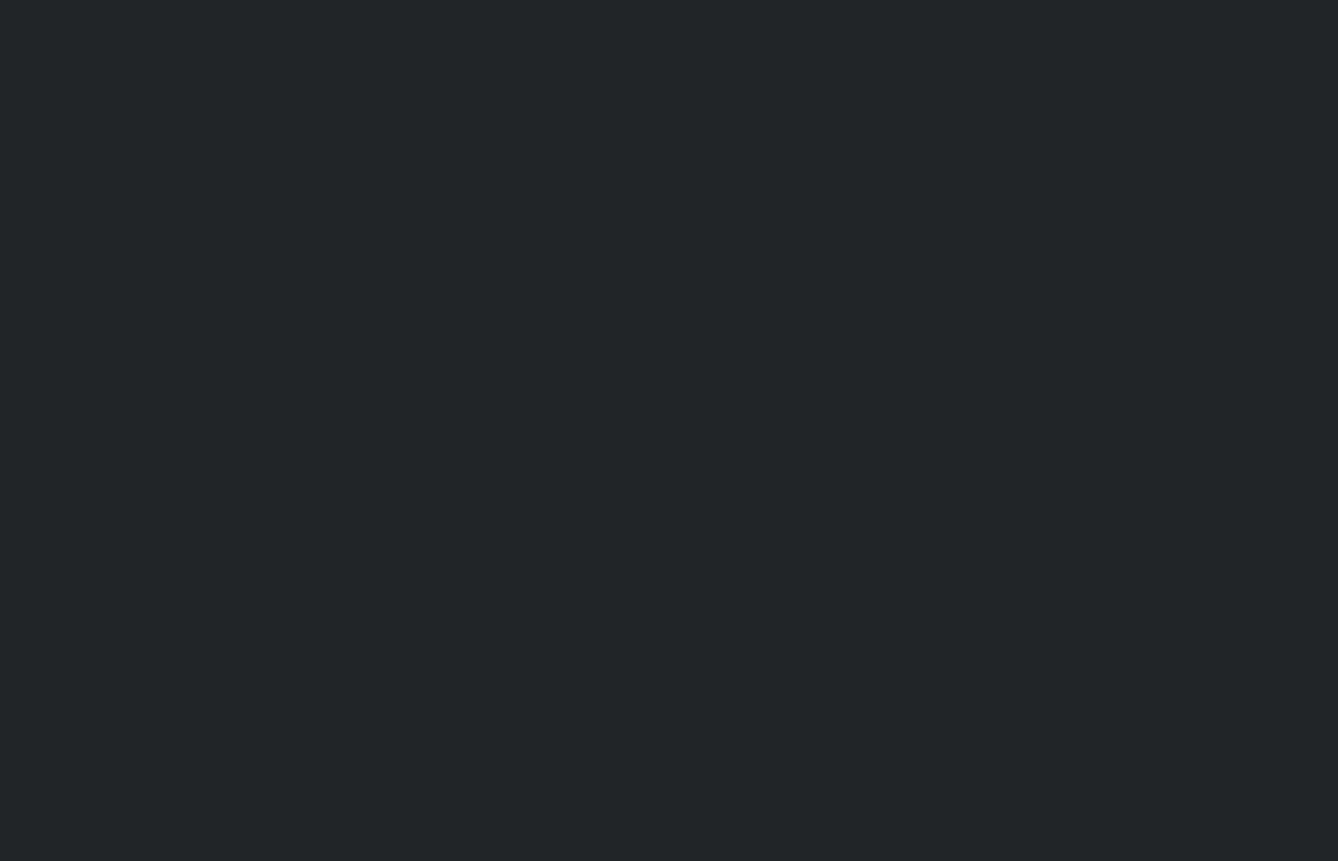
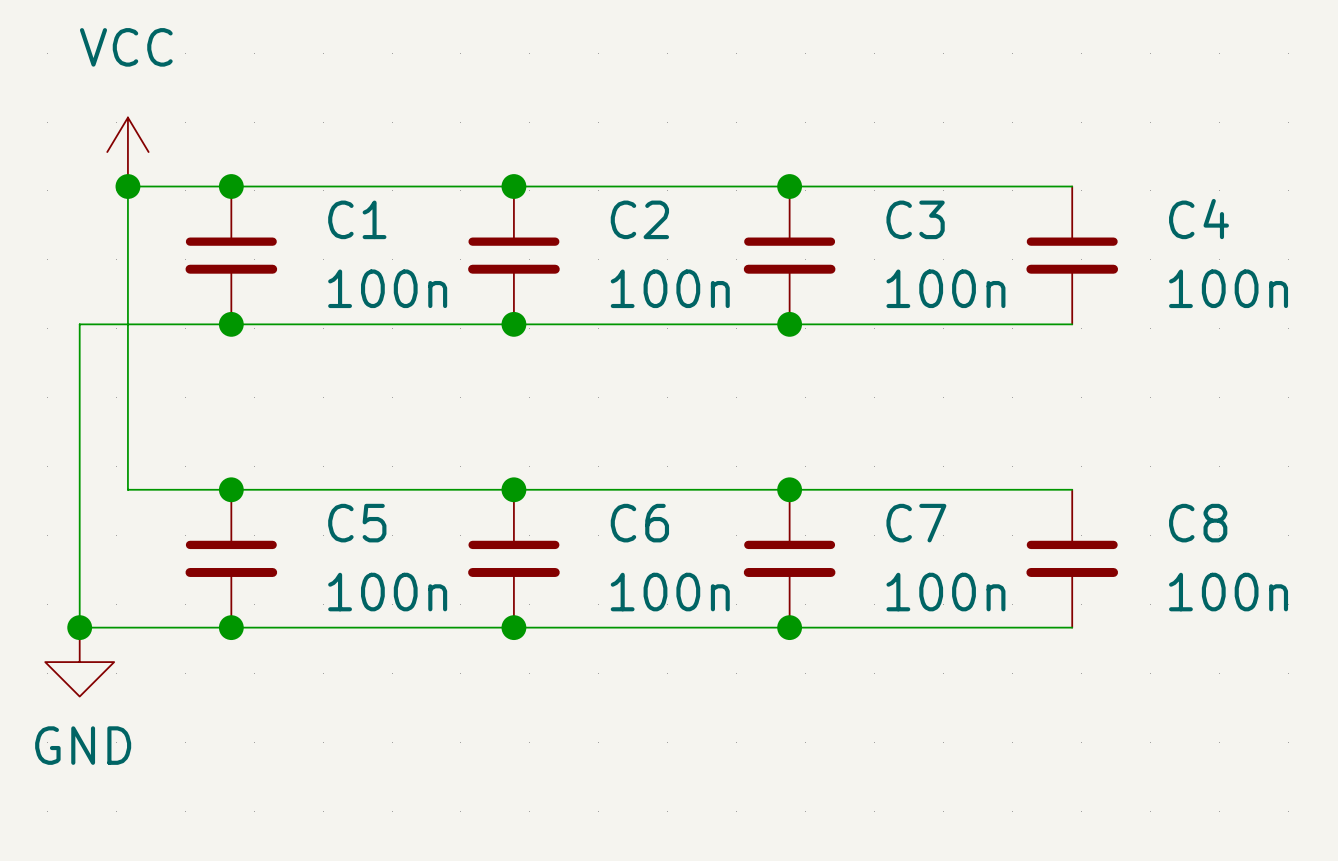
power symbol: none -> VCC (127, 152)
junction: none -> (127, 186)
junction: none -> (231, 186)
junction: none -> (513, 186)
junction: none -> (789, 186)
wire: none -> (1072, 186) (127, 186) (127, 489) (1072, 489)
C1: none -> 100n (231, 255)
C2: none -> 100n (513, 255)
C3: none -> 100n (789, 255)
C4: none -> 100n (1072, 255)
junction: none -> (231, 324)
junction: none -> (513, 324)
junction: none -> (789, 324)
wire: none -> (1072, 324) (79, 324) (79, 627) (1072, 627)
junction: none -> (231, 489)
junction: none -> (513, 489)
junction: none -> (789, 489)
C5: none -> 100n (231, 558)
C6: none -> 100n (513, 558)
C7: none -> 100n (789, 558)
C8: none -> 100n (1072, 558)
junction: none -> (79, 627)
junction: none -> (231, 627)
junction: none -> (513, 627)
junction: none -> (789, 627)
power symbol: none -> GND (79, 662)

